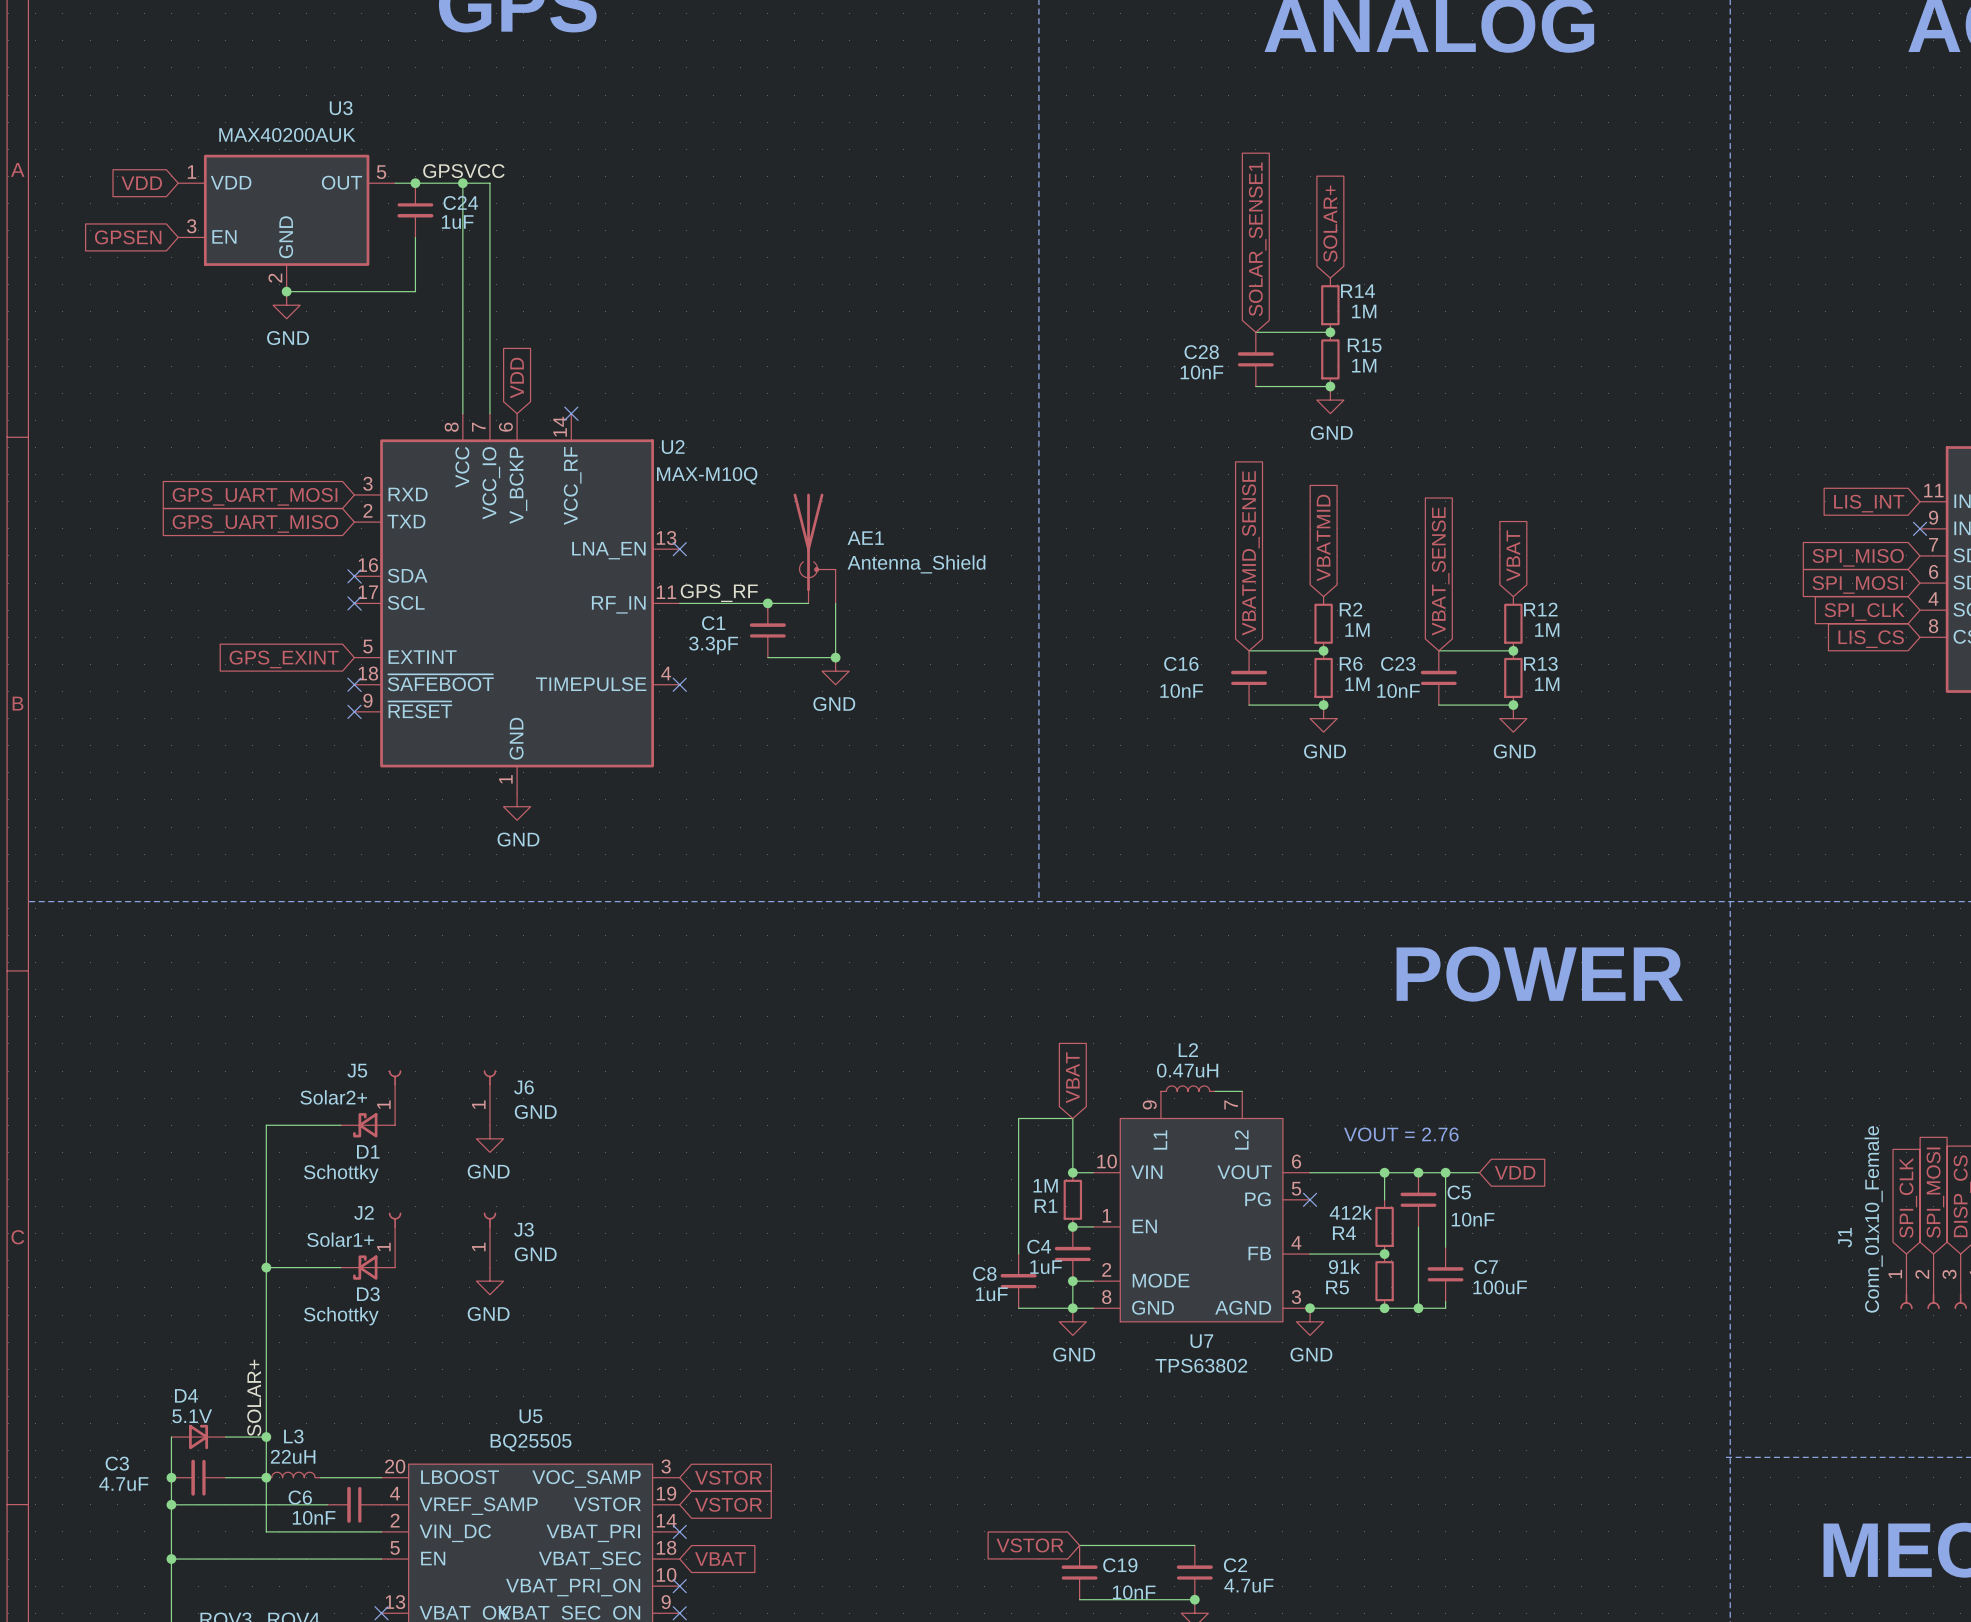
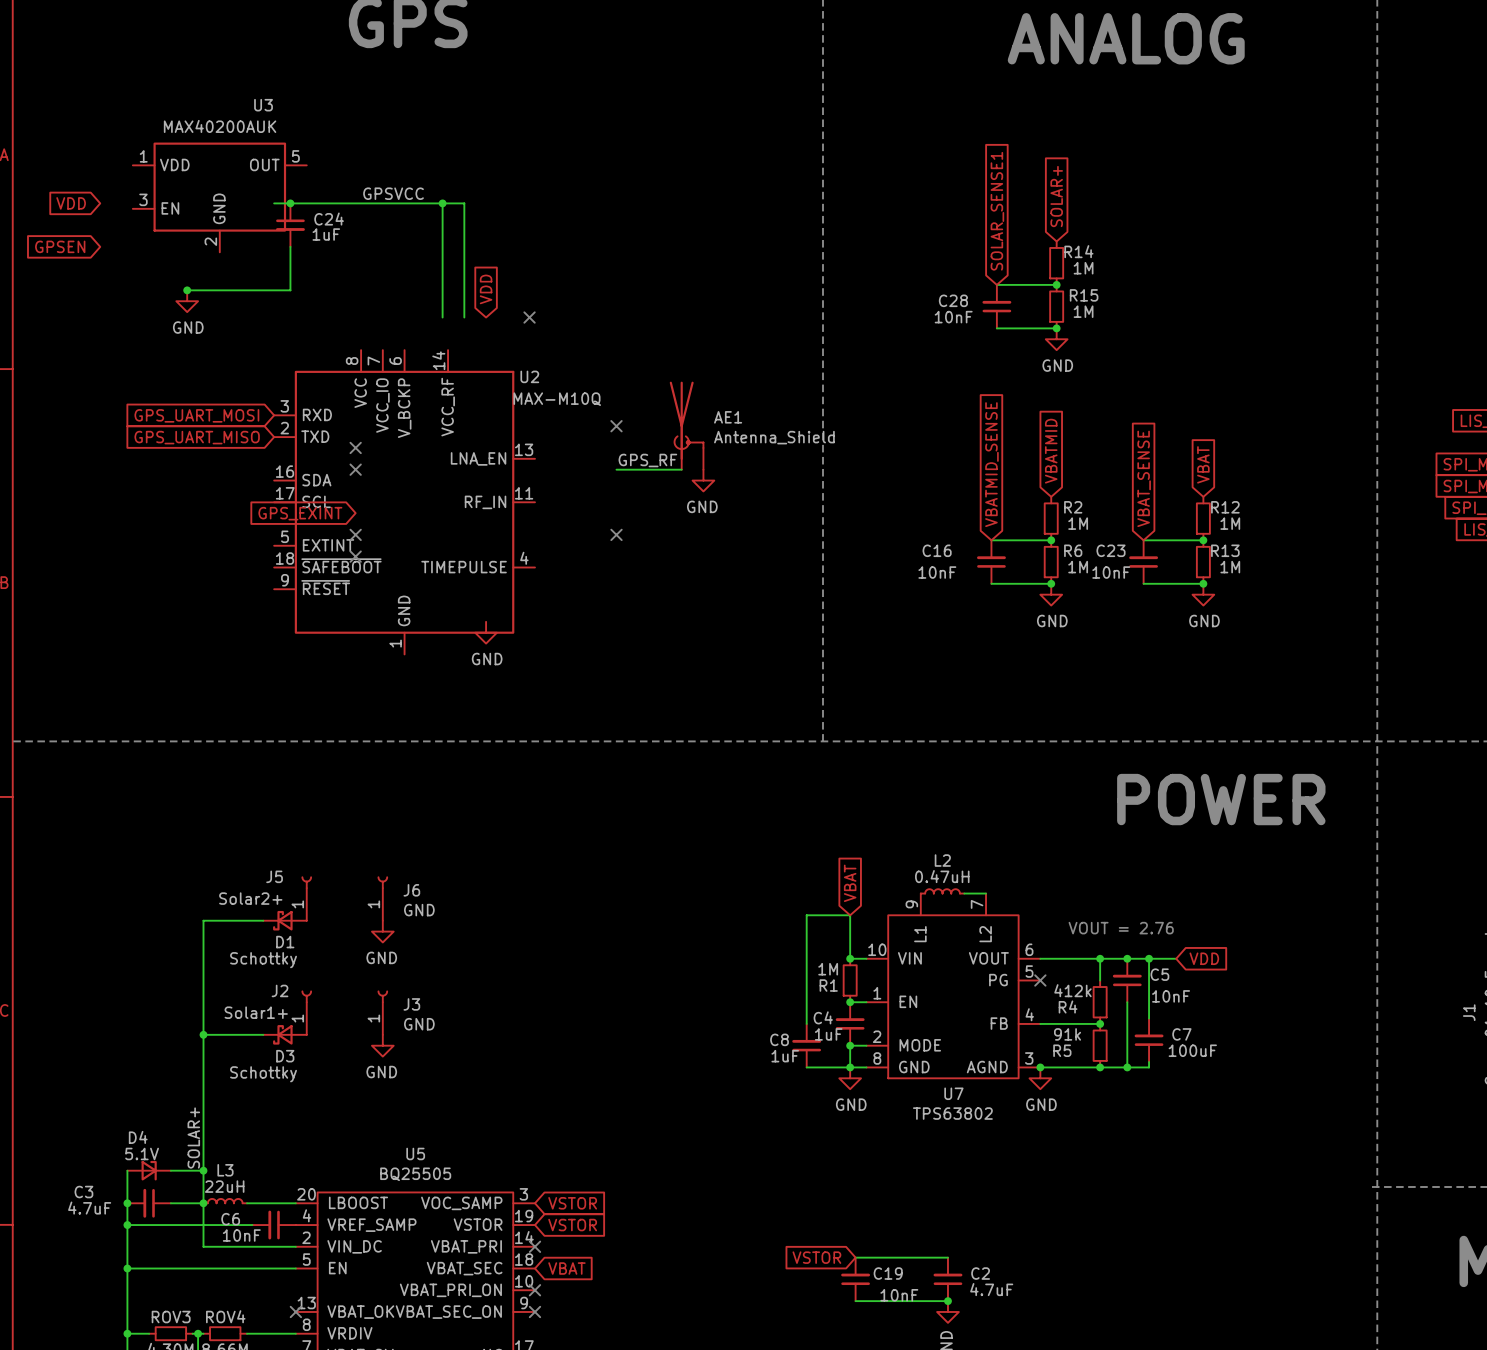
label position: GPSVCC (463, 171) -> GPSVCC (393, 193)
global label position: VDD (141, 183) -> VDD (71, 203)
wire: (395, 183) (489, 183) (489, 413) -> none
junction: (415, 183) -> none
wire: (462, 183) (462, 413) -> none
junction: (462, 183) -> none
C24 position: (415, 210) -> (290, 225)
wire: none -> (274, 203) (464, 203) (464, 317)
junction: none -> (290, 203)
wire: none -> (442, 203) (442, 317)
junction: none -> (442, 203)
global label position: GPSEN (128, 237) -> GPSEN (60, 246)
wire: (415, 237) (415, 291) (286, 291) -> (290, 246) (290, 290) (187, 290)
junction: (286, 291) -> none
power symbol position: GND (286, 305) -> GND (187, 301)
junction: none -> (187, 290)
no-connect mark: none -> (529, 317)
global label position: VDD (517, 378) -> VDD (486, 289)
no-connect mark: (571, 413) -> none
no-connect mark: none -> (616, 426)
no-connect mark: none -> (355, 447)
AE1 position: (814, 548) -> (686, 425)
no-connect mark: (679, 549) -> none
no-connect mark: none -> (355, 469)
wire: none -> (616, 469) (681, 469)
no-connect mark: (354, 576) -> none
label position: GPS_RF (719, 593) -> GPS_RF (647, 460)
no-connect mark: (354, 603) -> none
wire: (679, 603) (808, 603) -> none
junction: (767, 603) -> none
wire: (835, 603) (835, 657) (767, 657) -> none
C1: 3.3pF (767, 630) -> none
no-connect mark: none -> (355, 534)
no-connect mark: none -> (616, 534)
junction: (835, 657) -> none
global label position: GPS_EXINT (284, 659) -> GPS_EXINT (300, 513)
no-connect mark: none -> (355, 556)
power symbol position: GND (835, 671) -> GND (703, 480)
no-connect mark: (354, 684) -> none
no-connect mark: (679, 684) -> none
no-connect mark: (354, 711) -> none
power symbol position: GND (517, 806) -> GND (486, 632)

